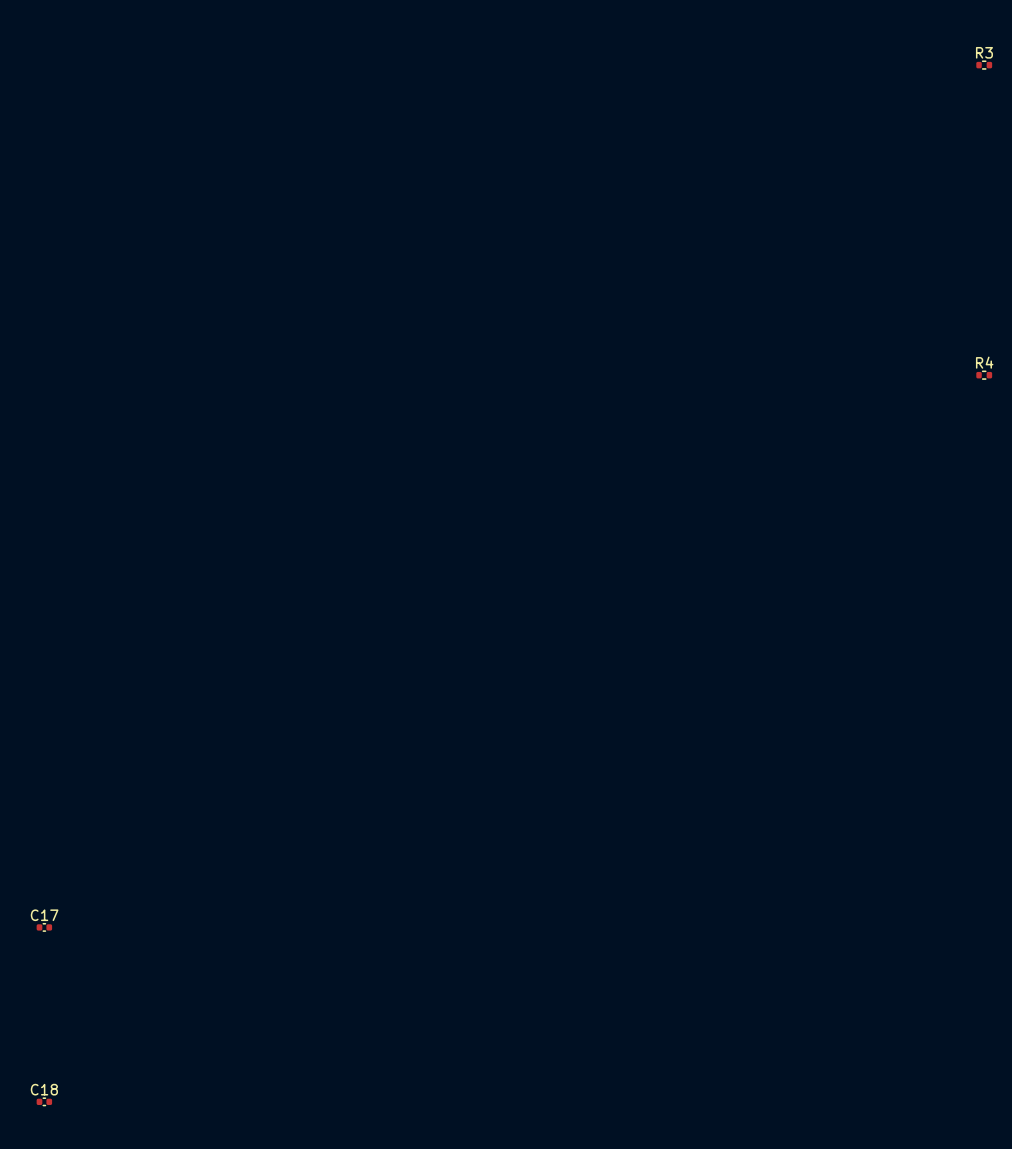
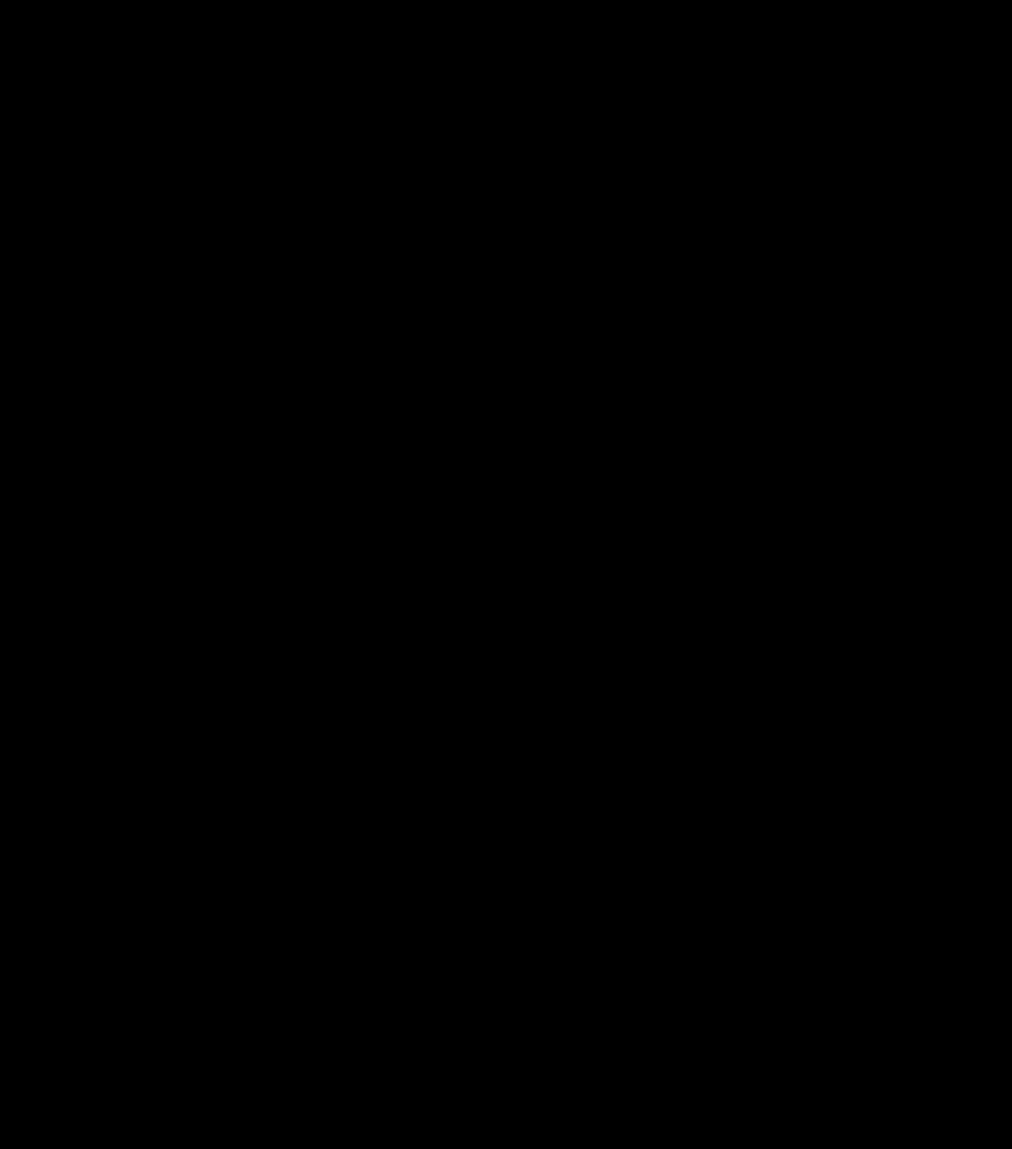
R3: (984, 65) -> none
R4: (984, 375) -> none
C17: (44, 927) -> none
C18: (44, 1101) -> none

